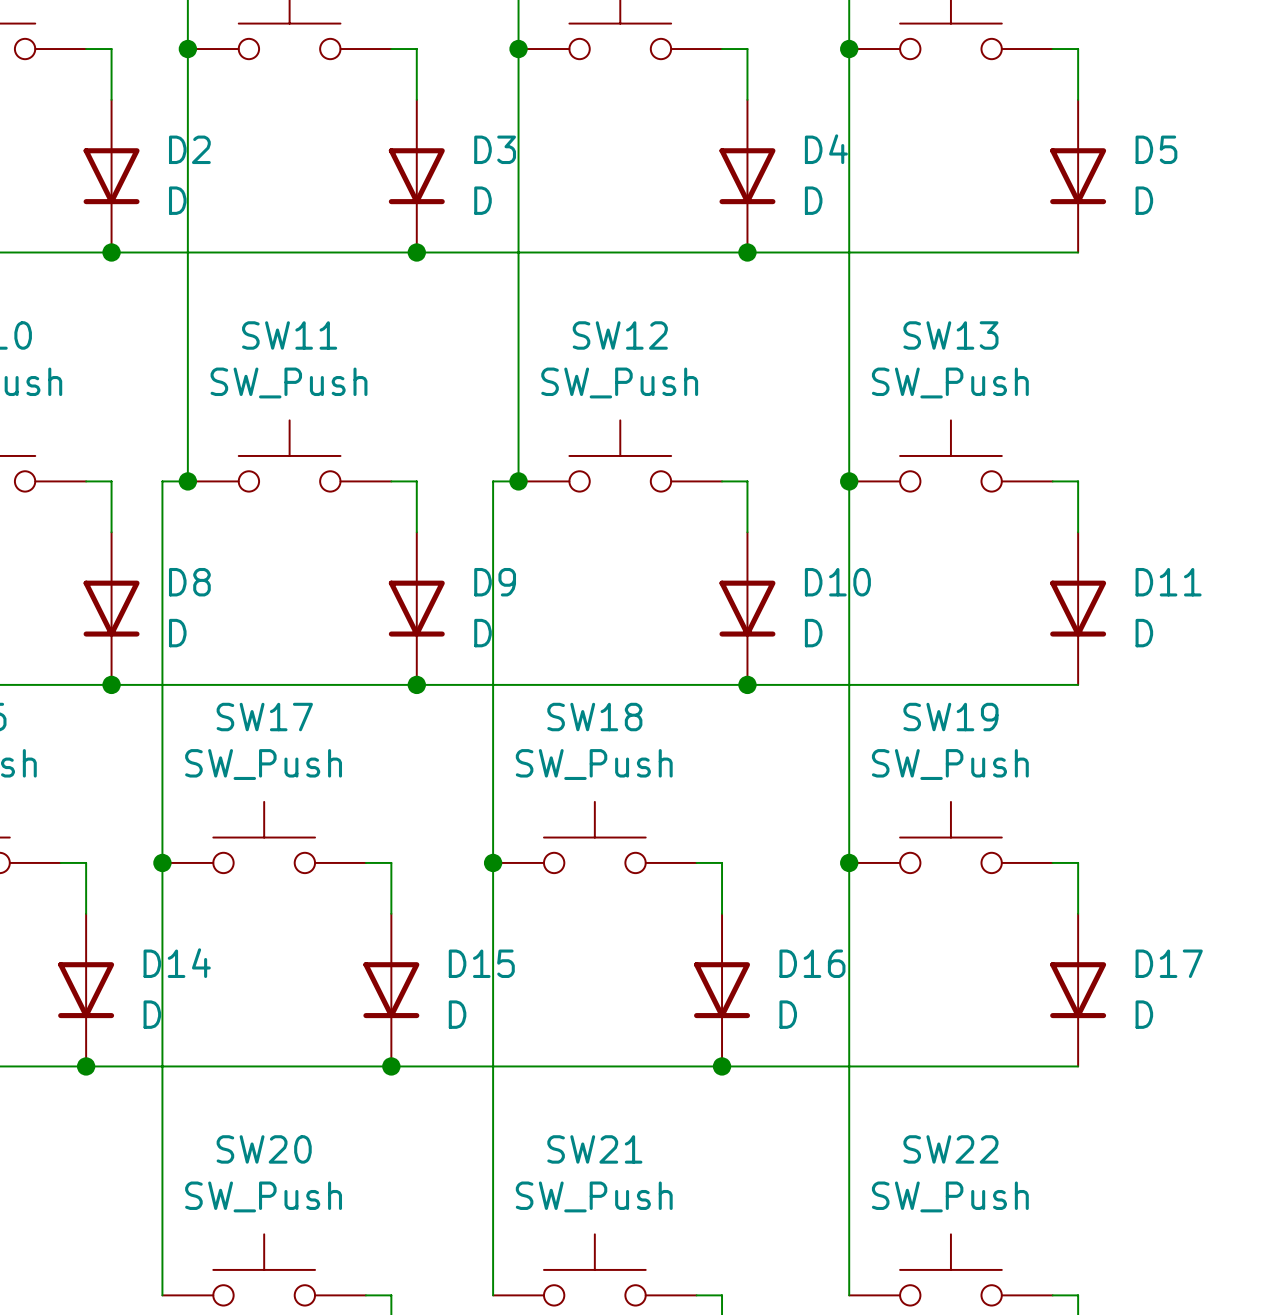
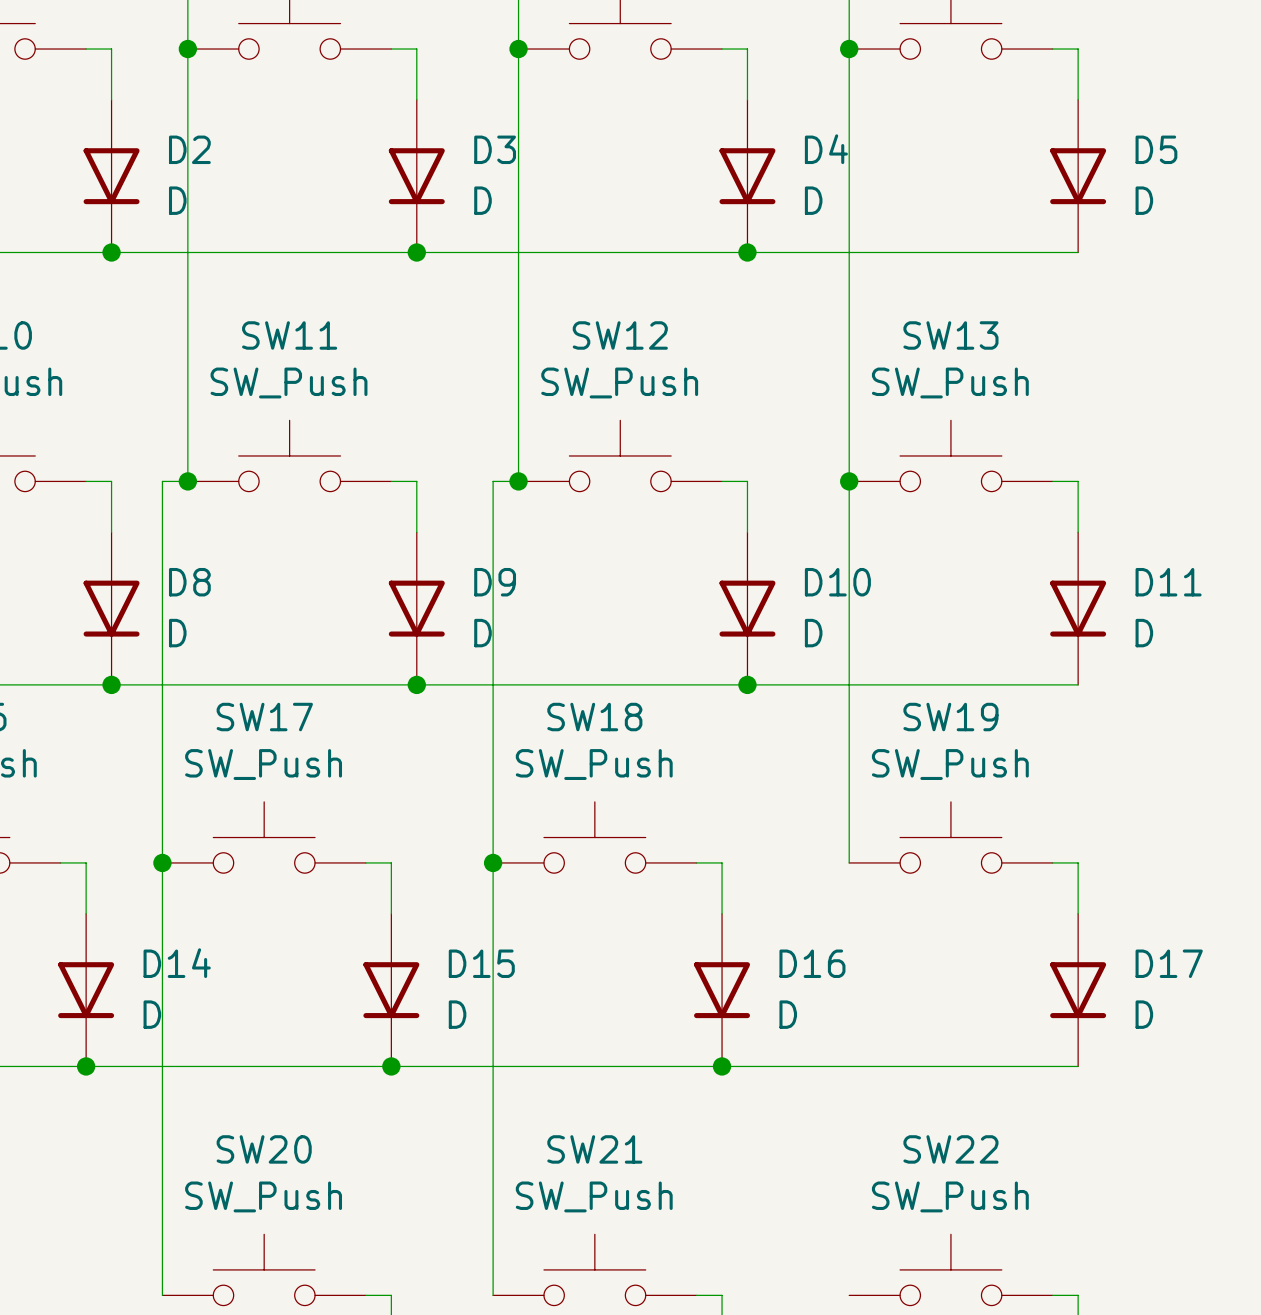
wire: (849, 862) (849, 1295) -> none
junction: (849, 862) -> none

